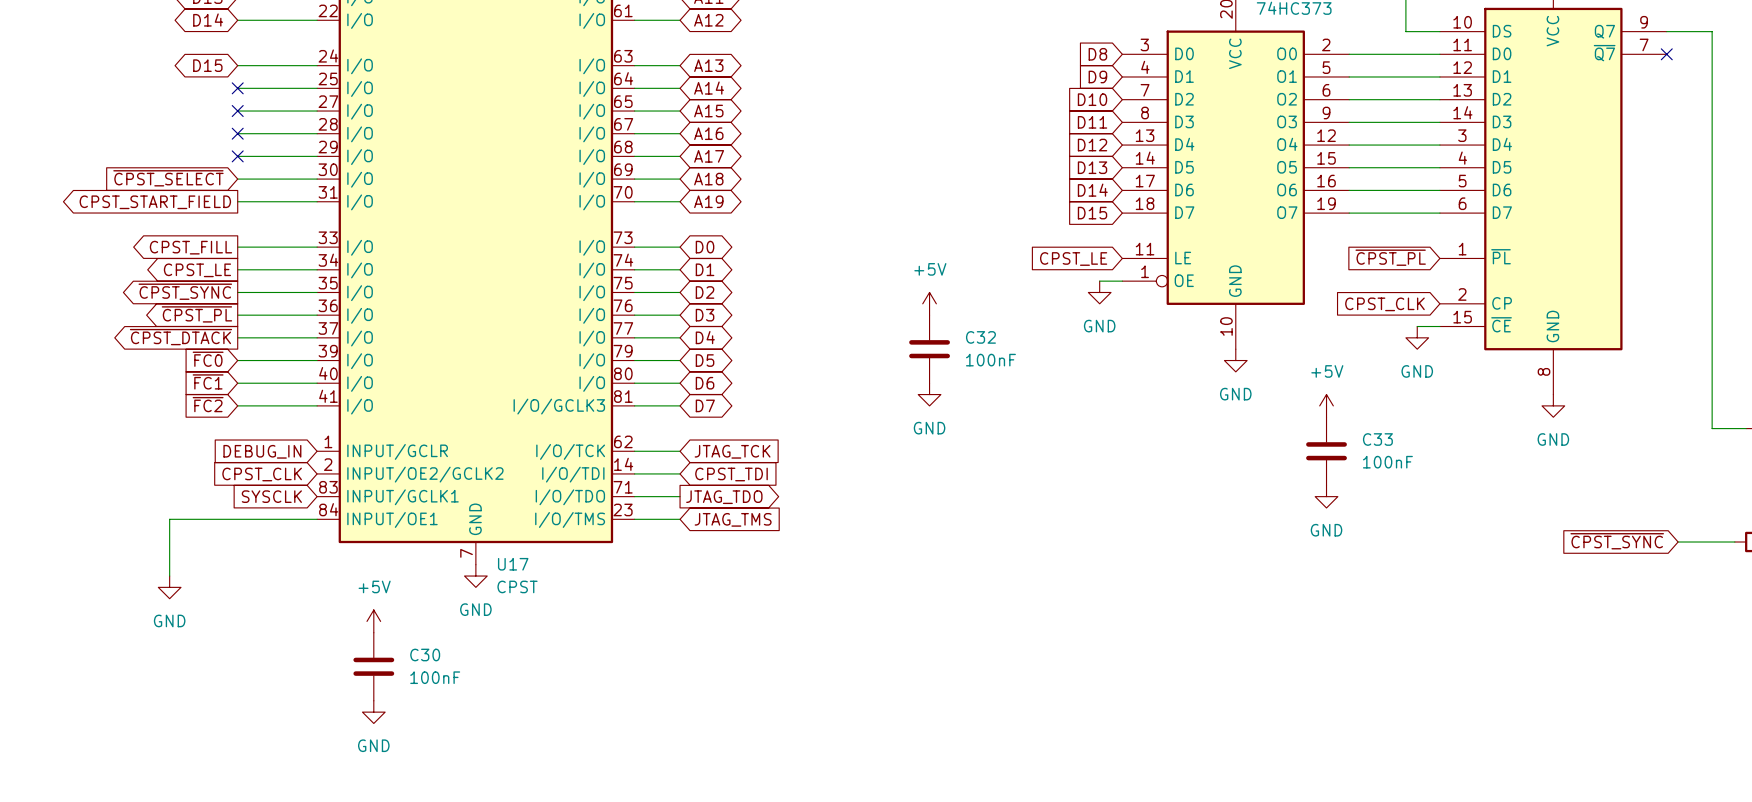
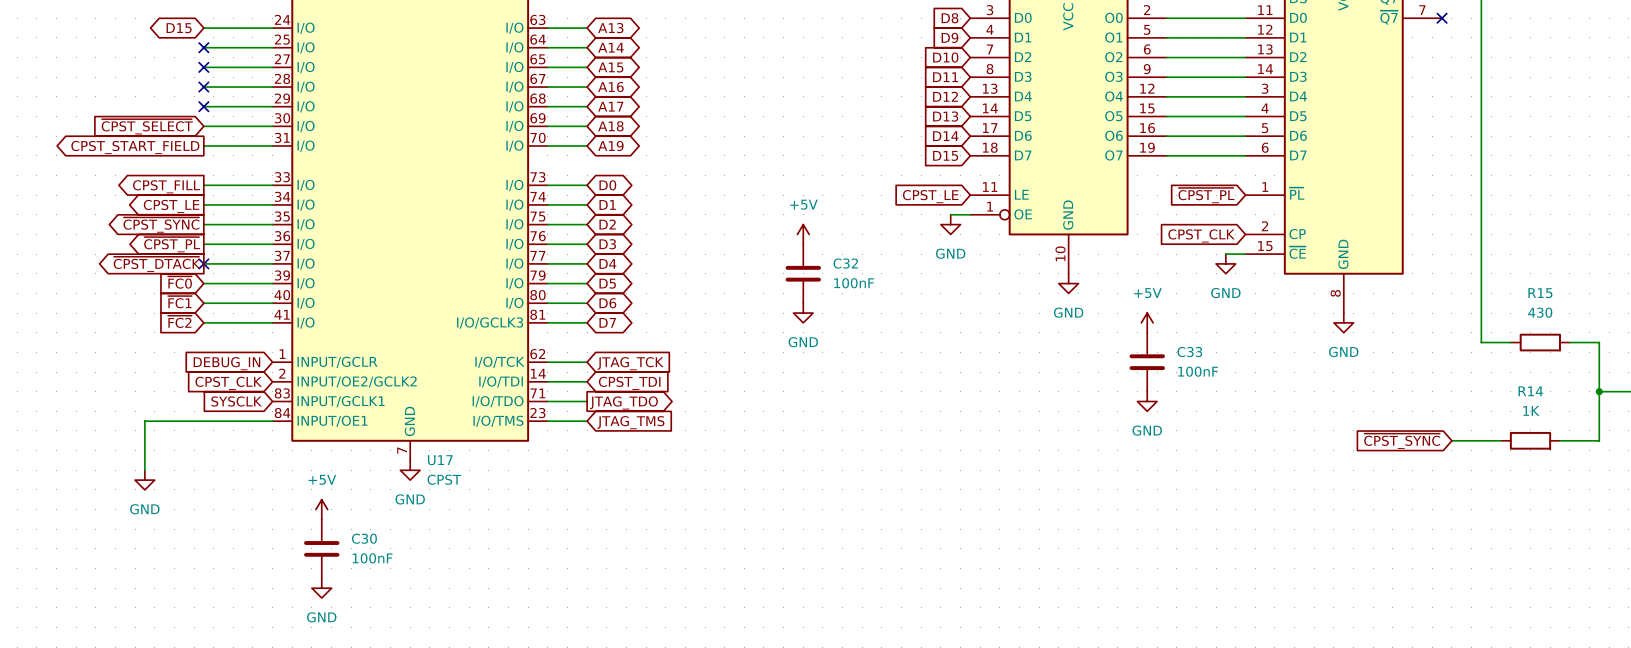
no-connect mark: none -> (203, 263)

